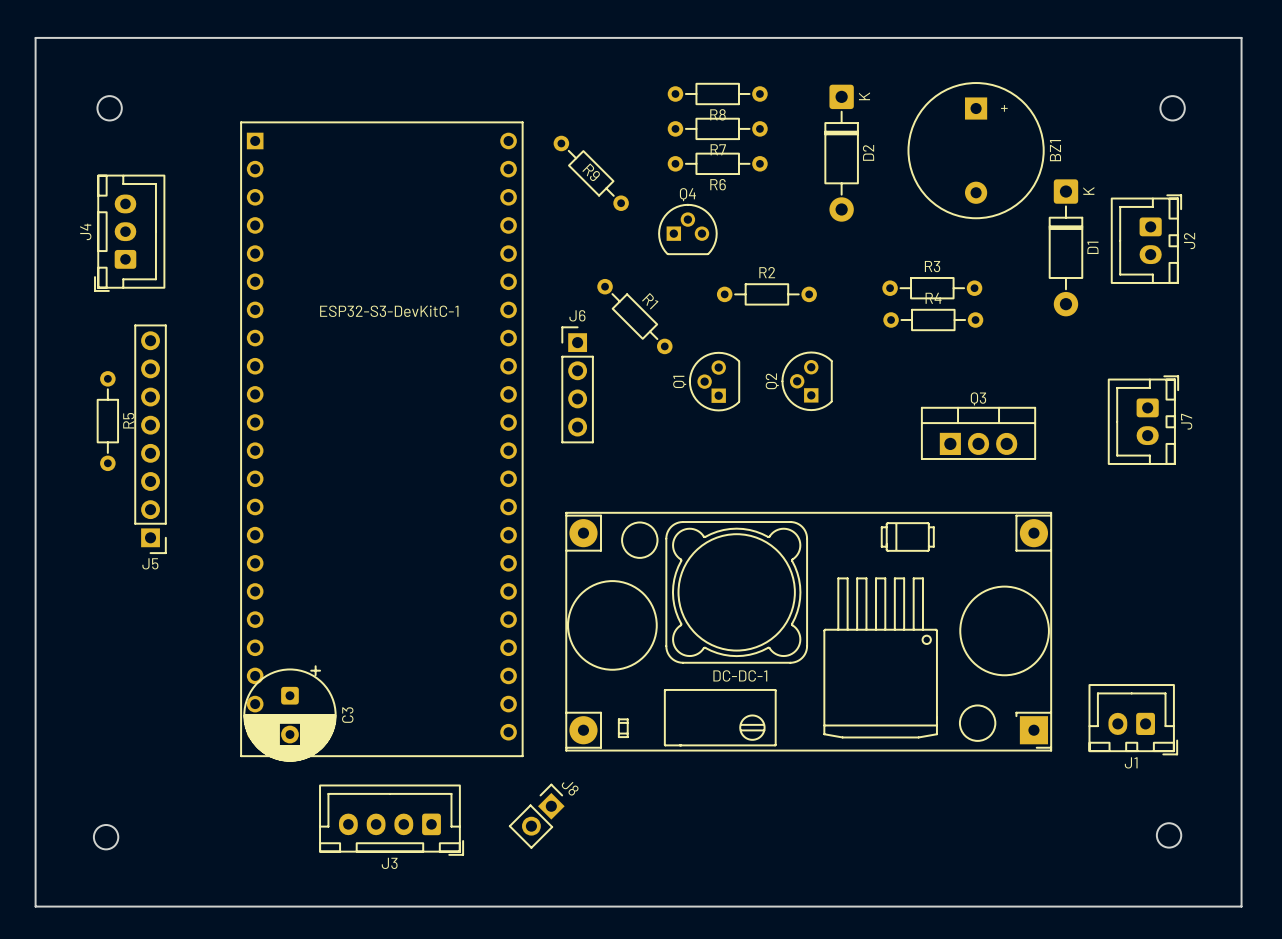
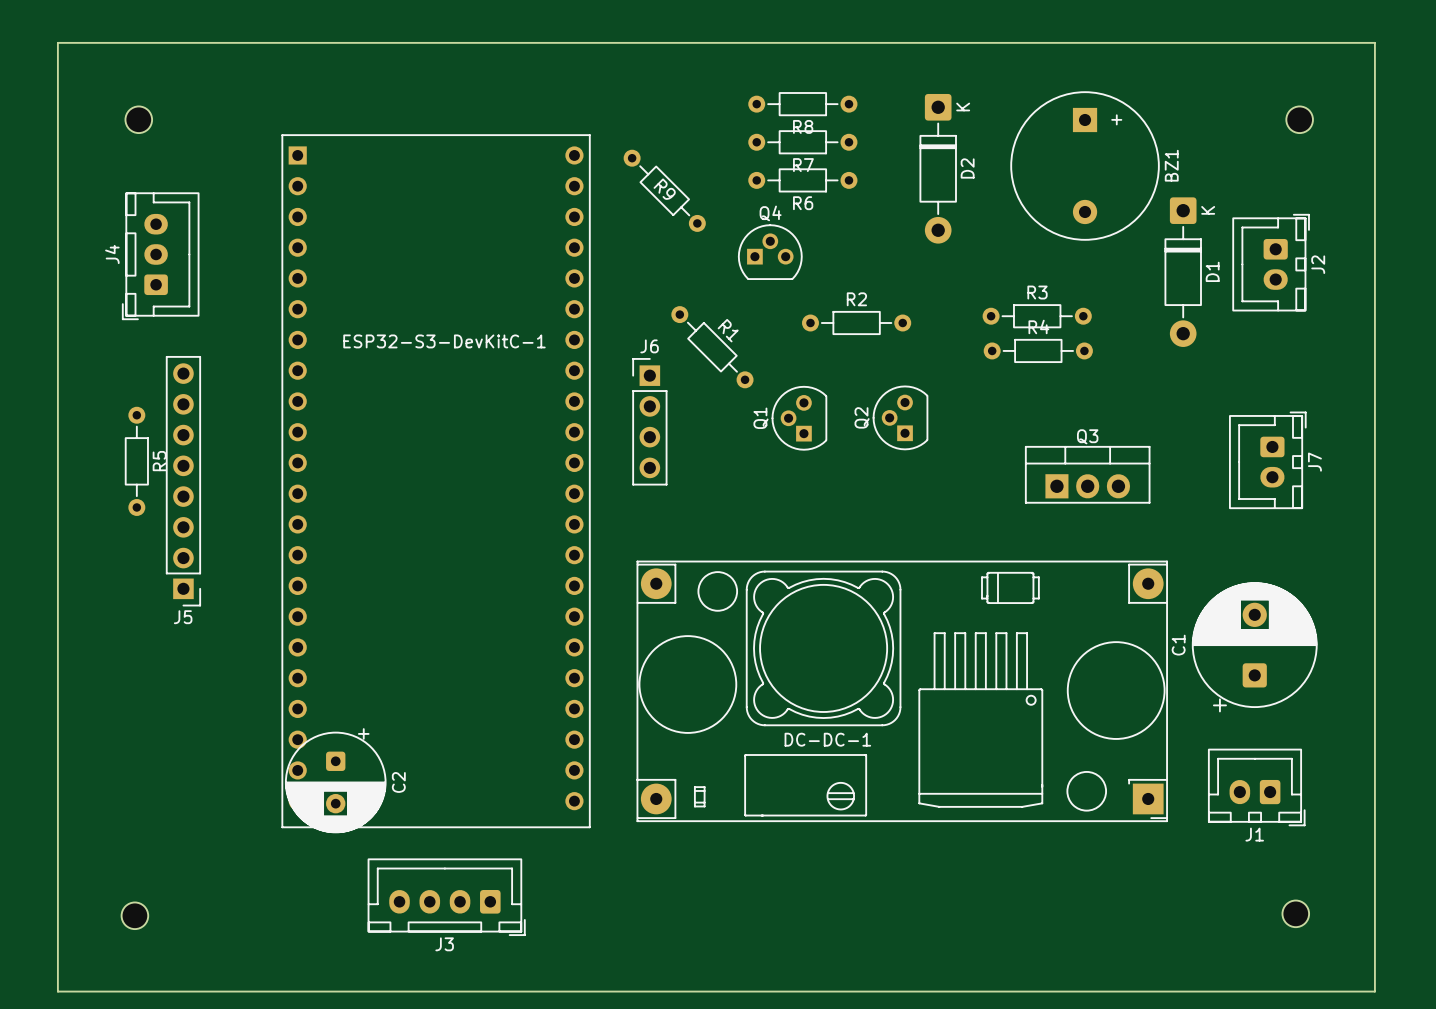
C1: none -> (1254, 647)
C3 name: C3 (347, 715) -> C2 (398, 782)
J8: (536, 816) -> none

